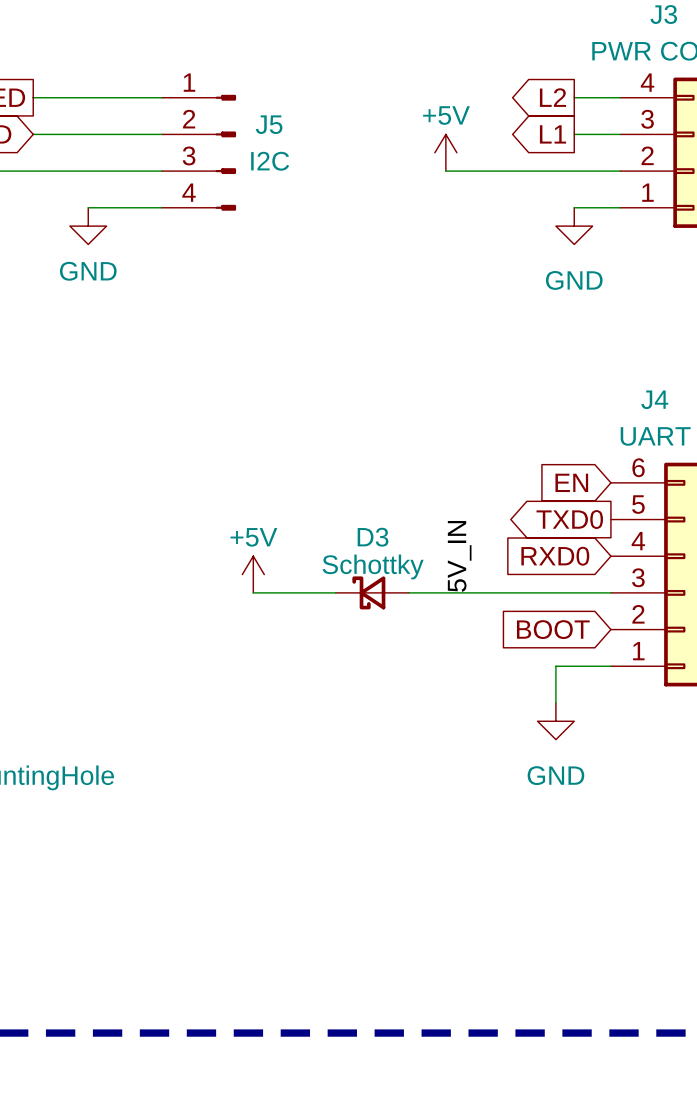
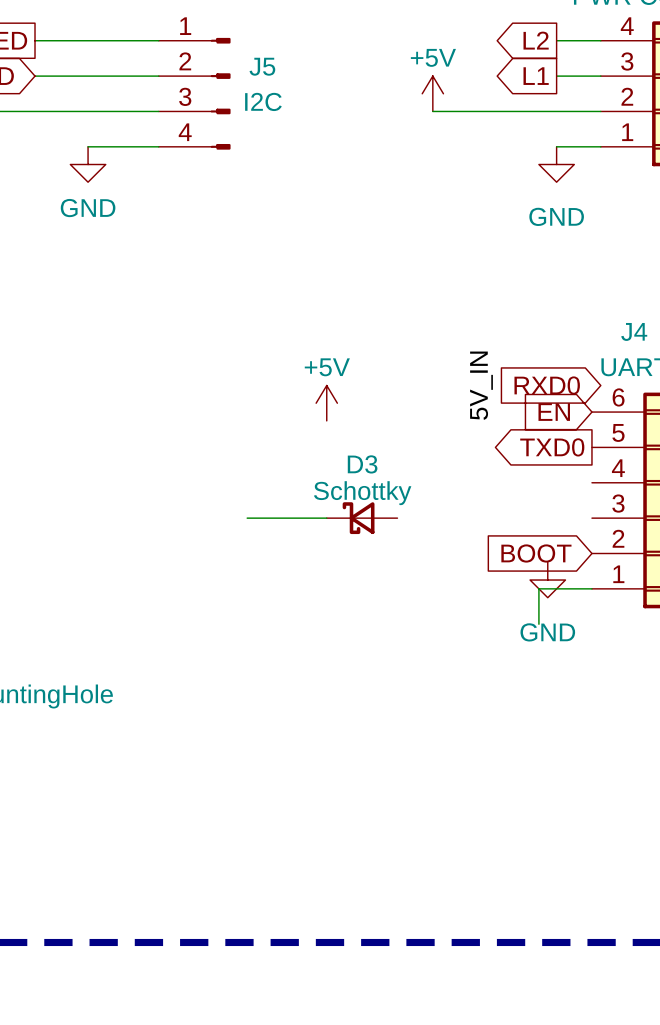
label position: 5V_IN (459, 556) -> 5V_IN (481, 385)
global label position: RXD0 (555, 556) -> RXD0 (547, 385)
power symbol position: +5V (253, 574) -> +5V (326, 403)
wire: (409, 592) (610, 592) -> none
power symbol position: GND (555, 721) -> GND (547, 580)

